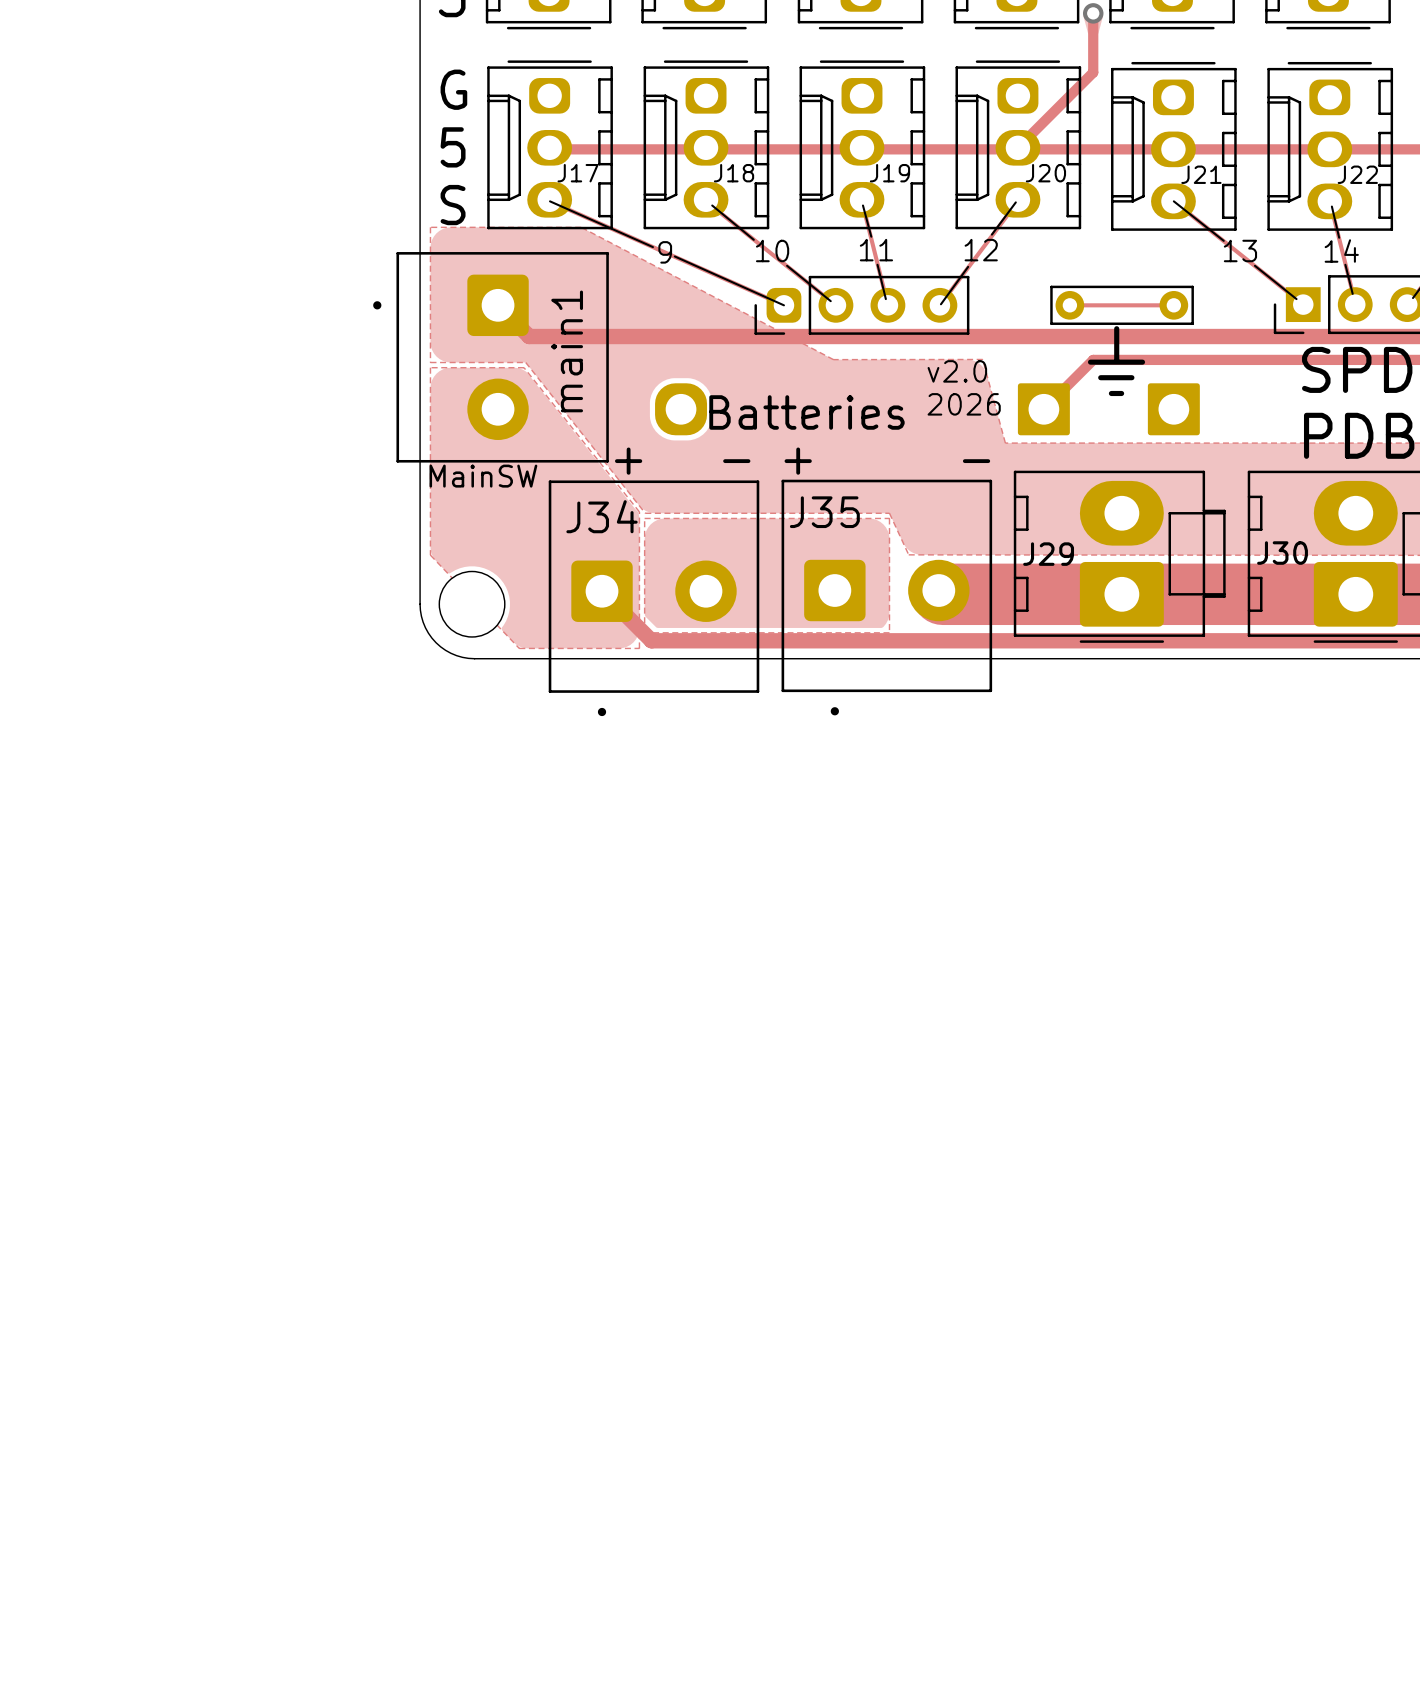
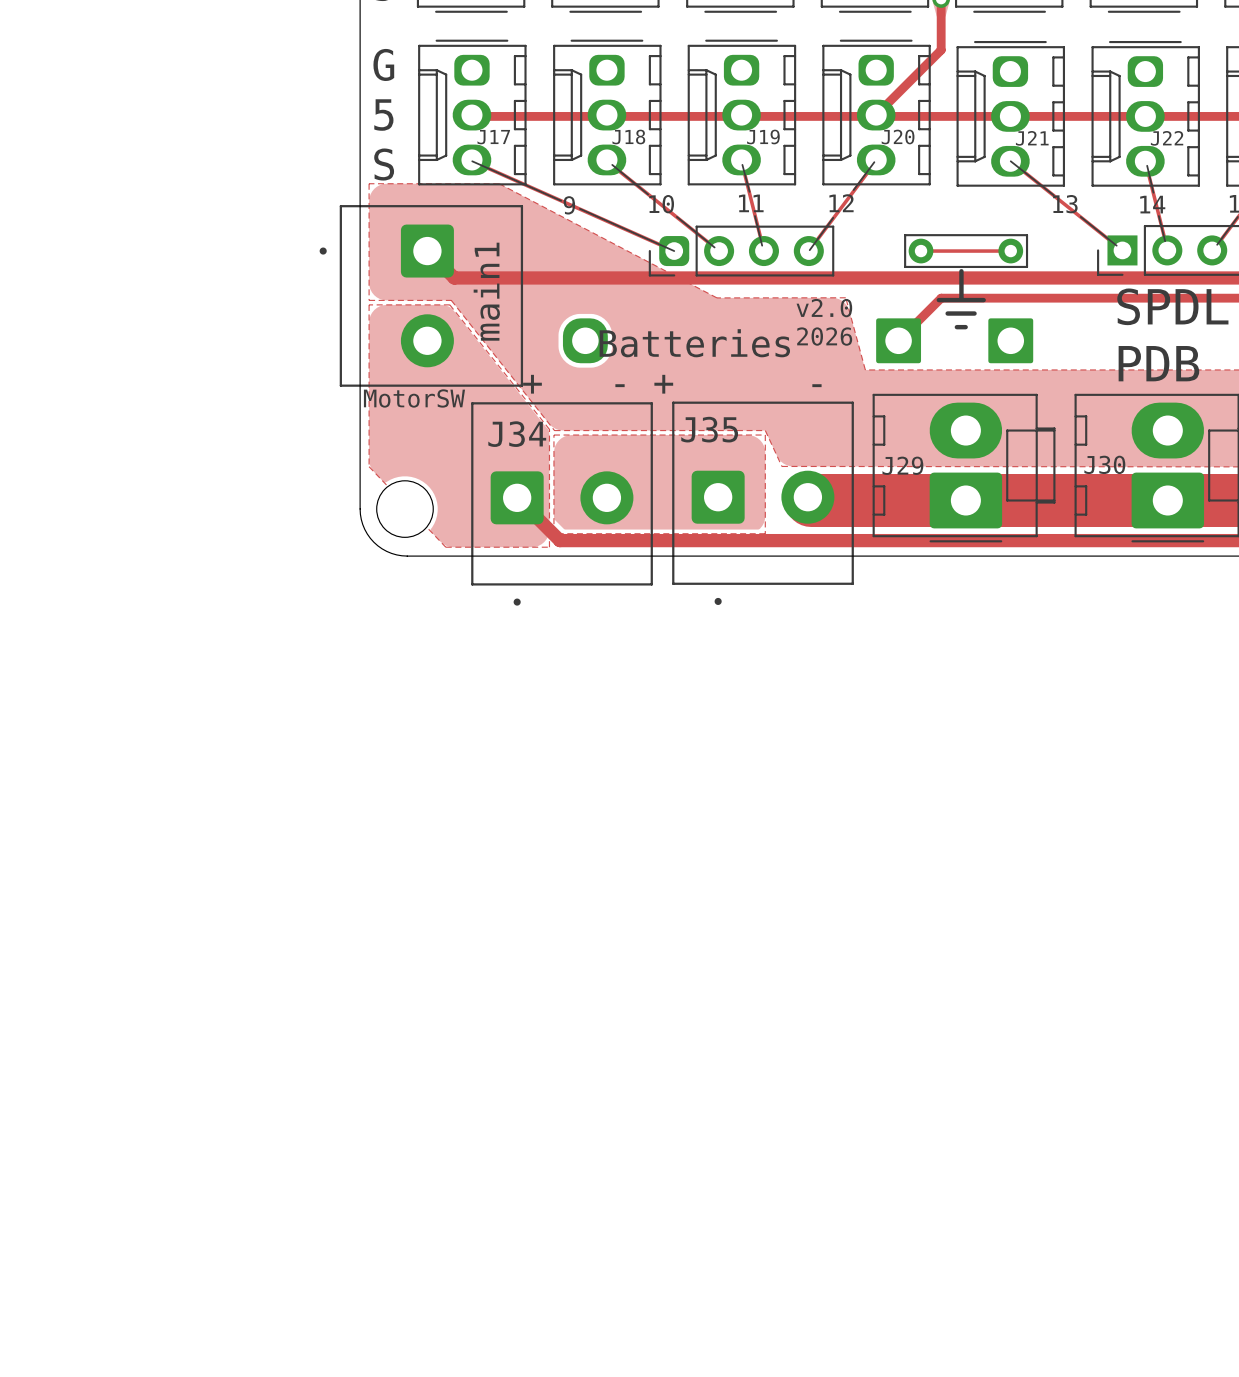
main1 value: MainSW (483, 476) -> MotorSW (414, 398)

